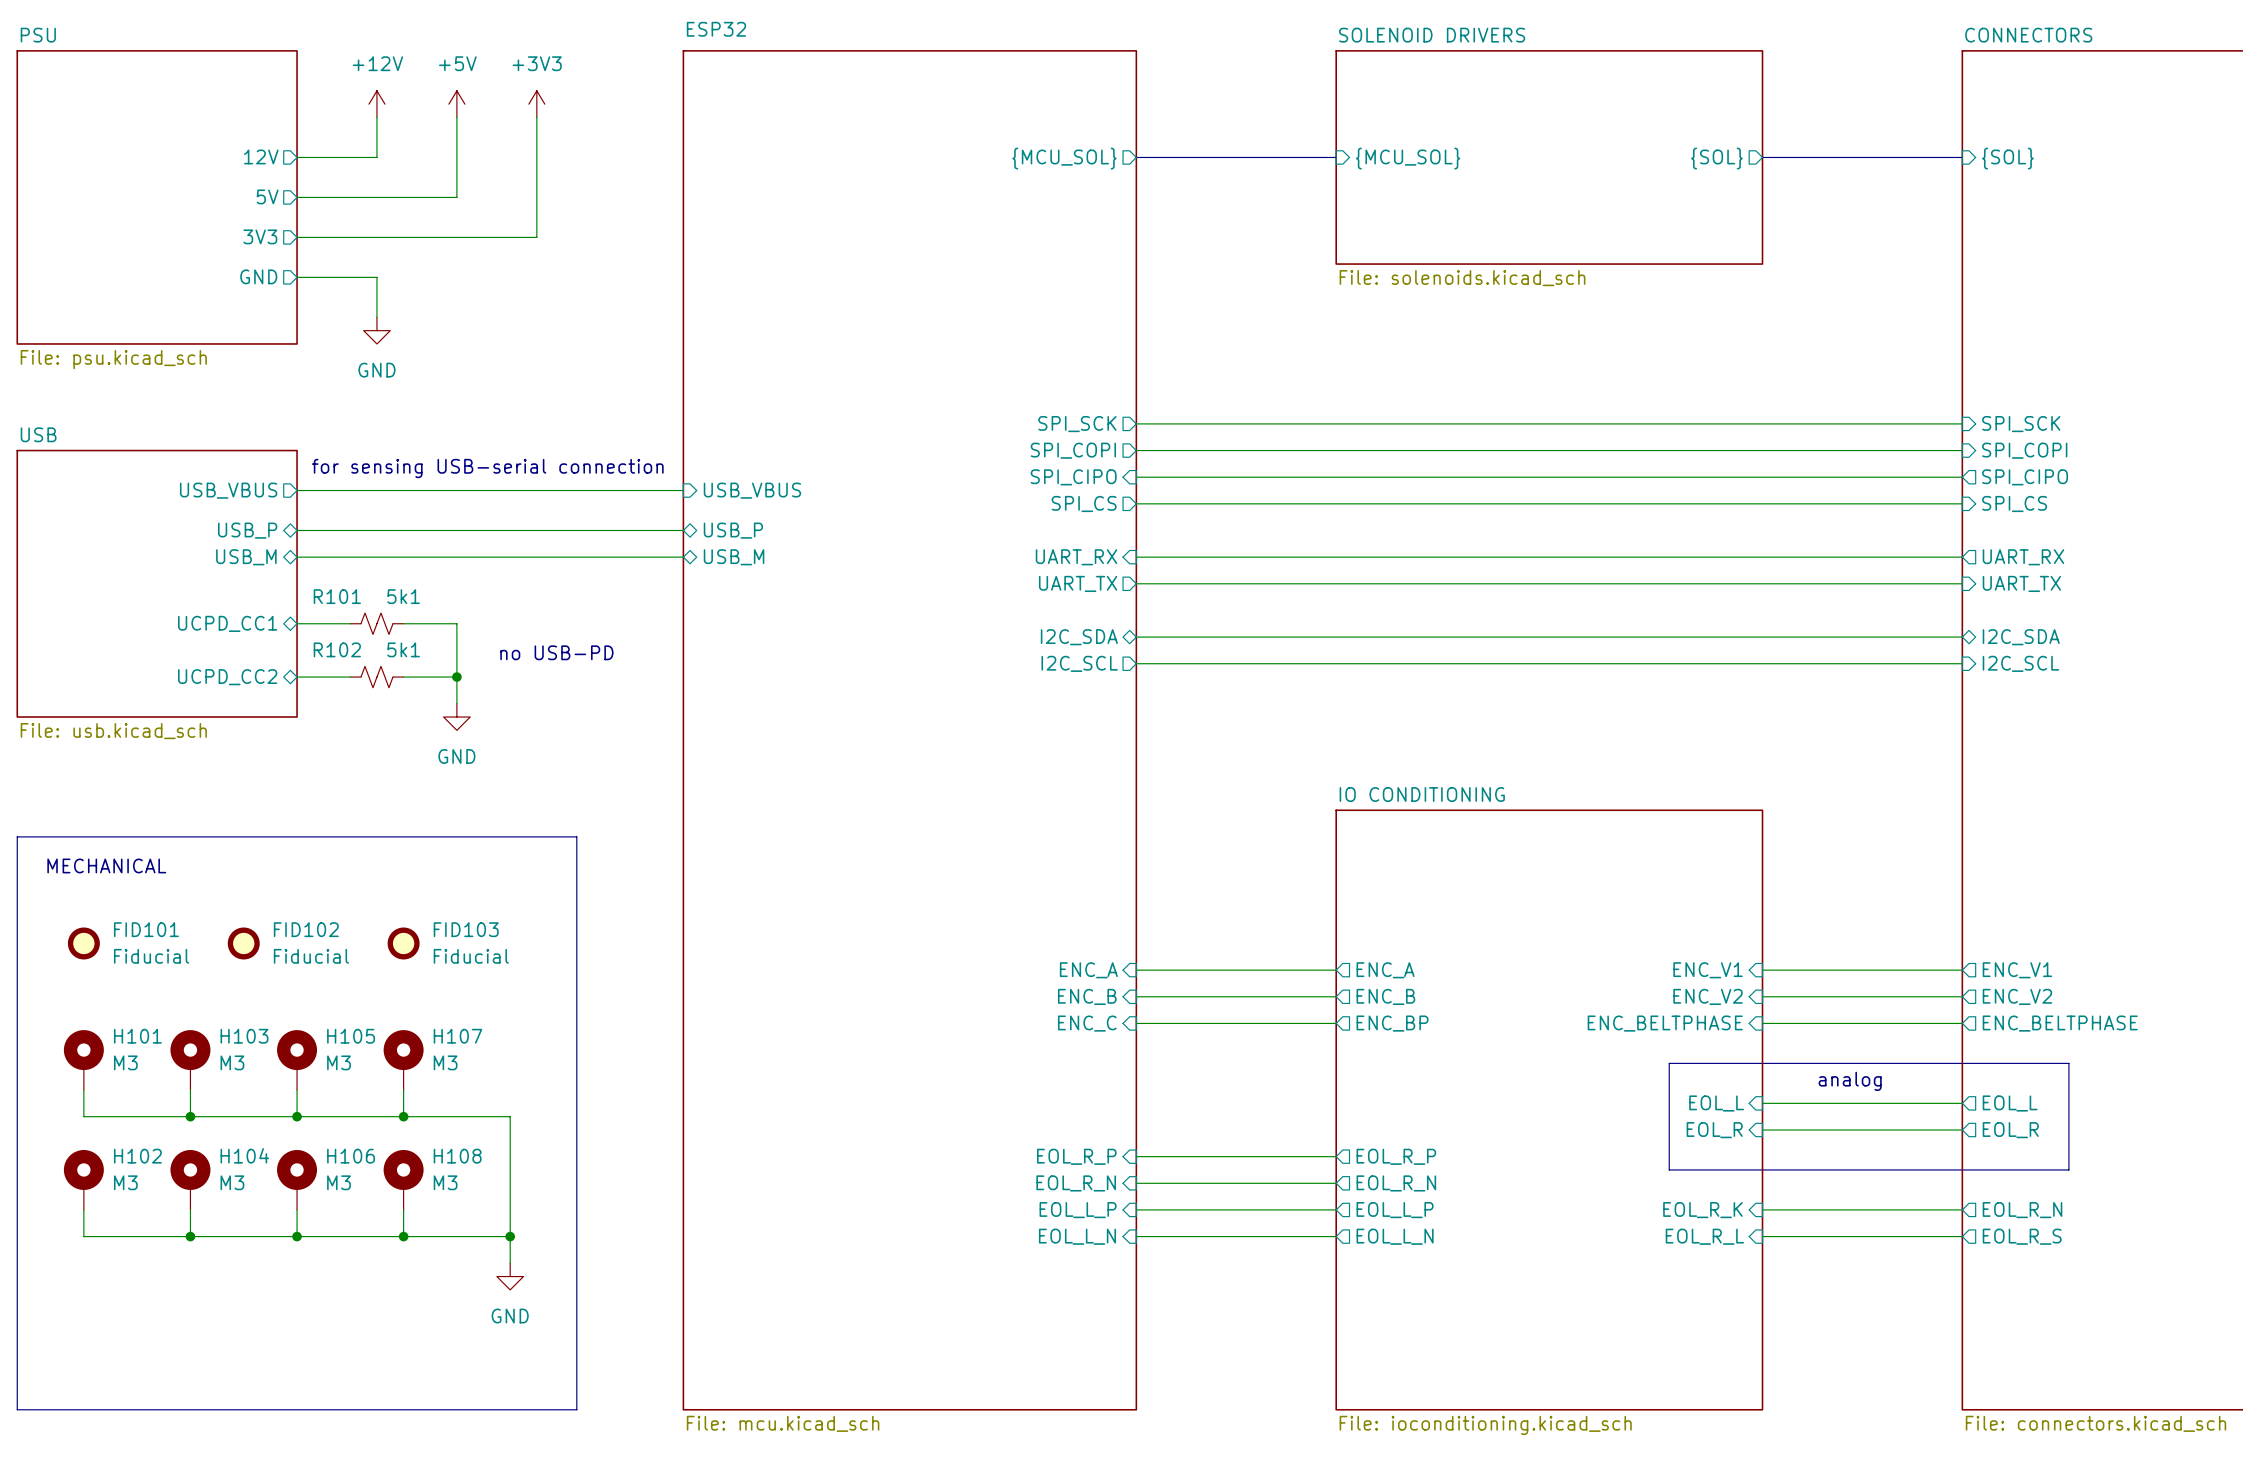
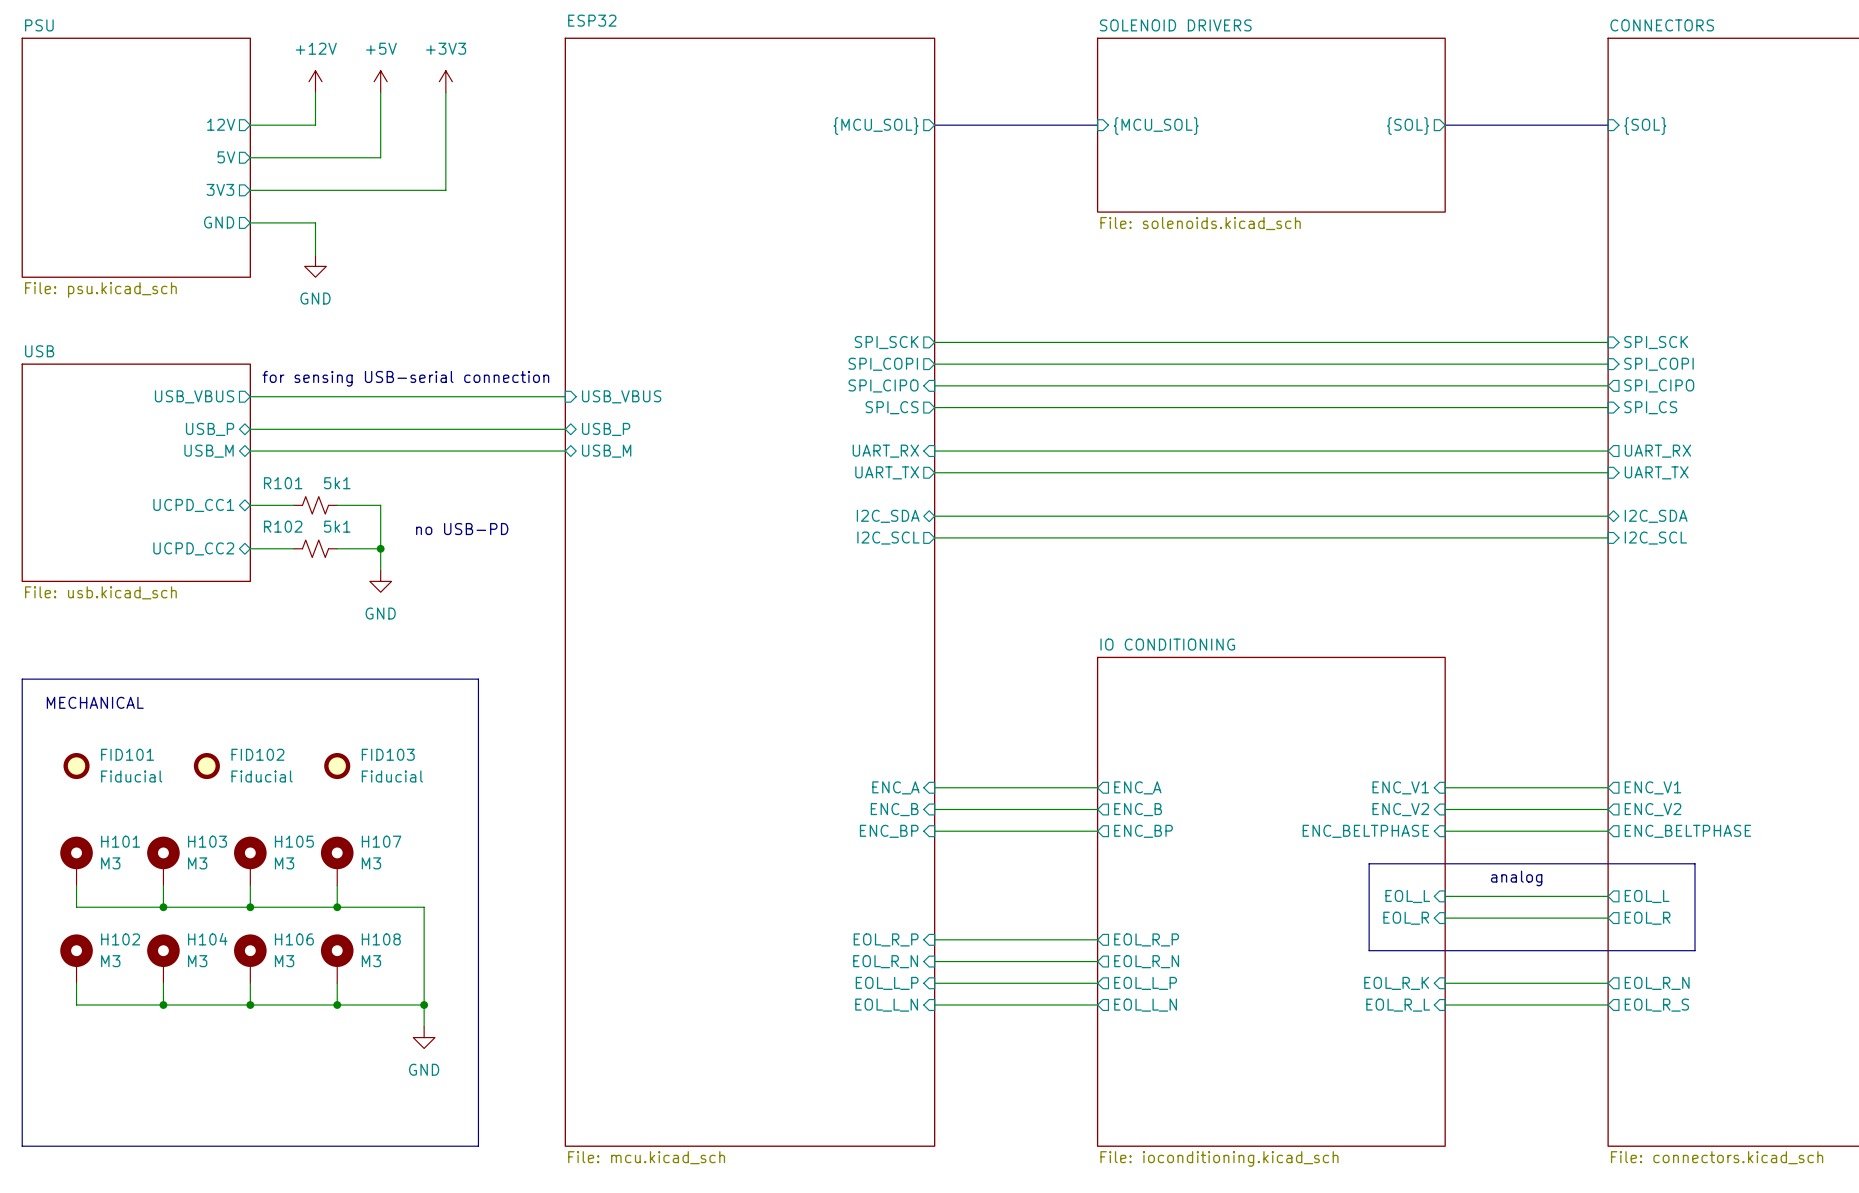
sheet pin: ENC_C (1087, 1023) -> ENC_BP (889, 831)

